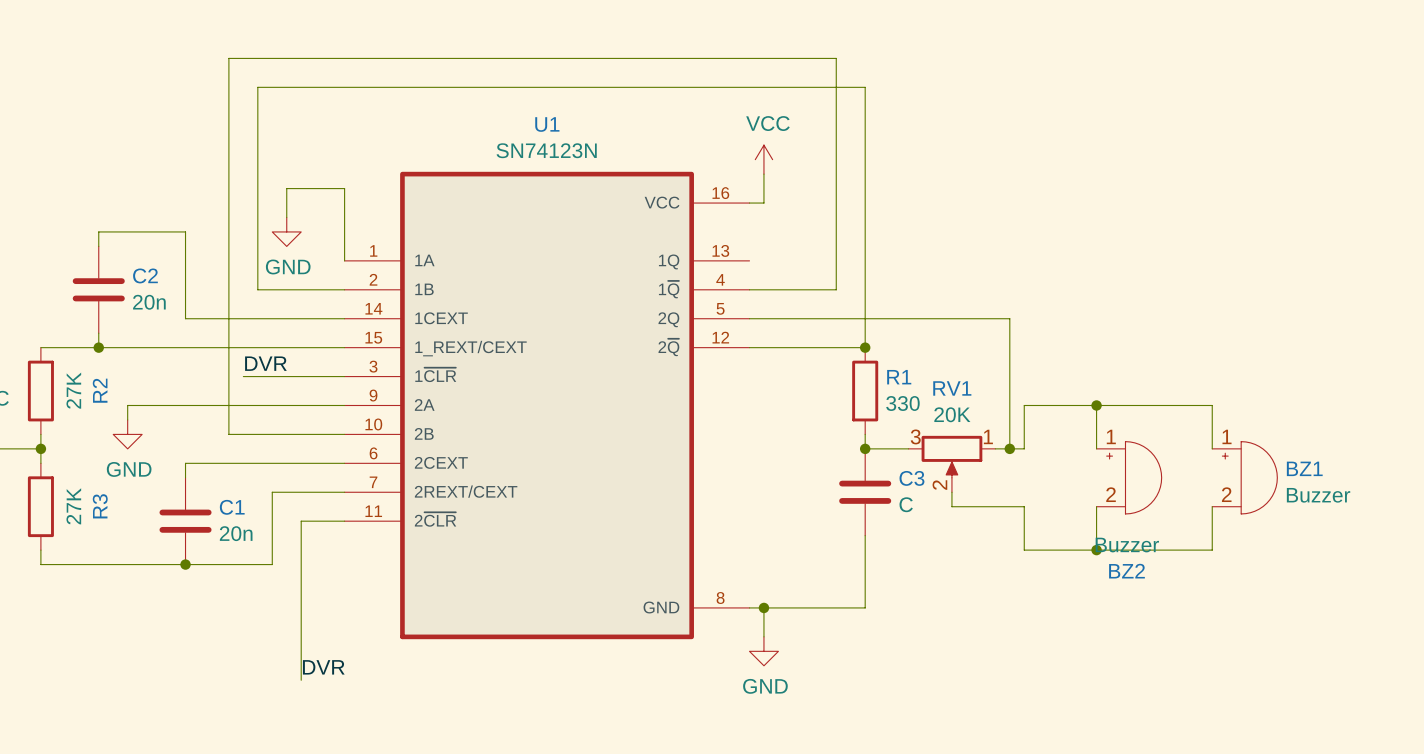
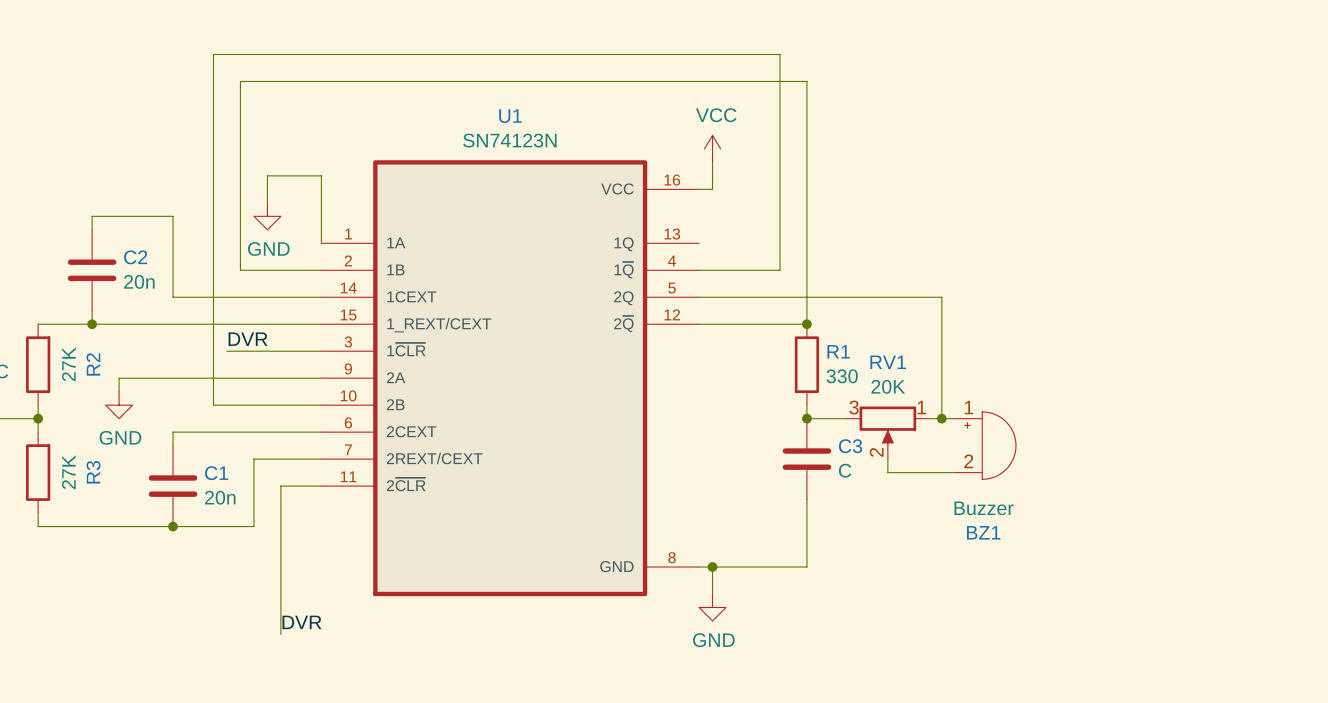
wire: (1096, 405) (1096, 448) -> none
junction: (1096, 405) -> none
wire: (1024, 448) (1024, 405) (1212, 405) (1212, 448) -> none
BZ1 name position: BZ1 (1304, 468) -> BZ1 (983, 532)
BZ2: Buzzer (1129, 477) -> none
BZ1 position: (1244, 477) -> (985, 445)
BZ1 value position: Buzzer (1318, 495) -> Buzzer (984, 508)
wire: (1024, 506) (1024, 550) (1212, 550) (1212, 506) -> none
wire: (1096, 506) (1096, 550) -> none
junction: (1096, 550) -> none

